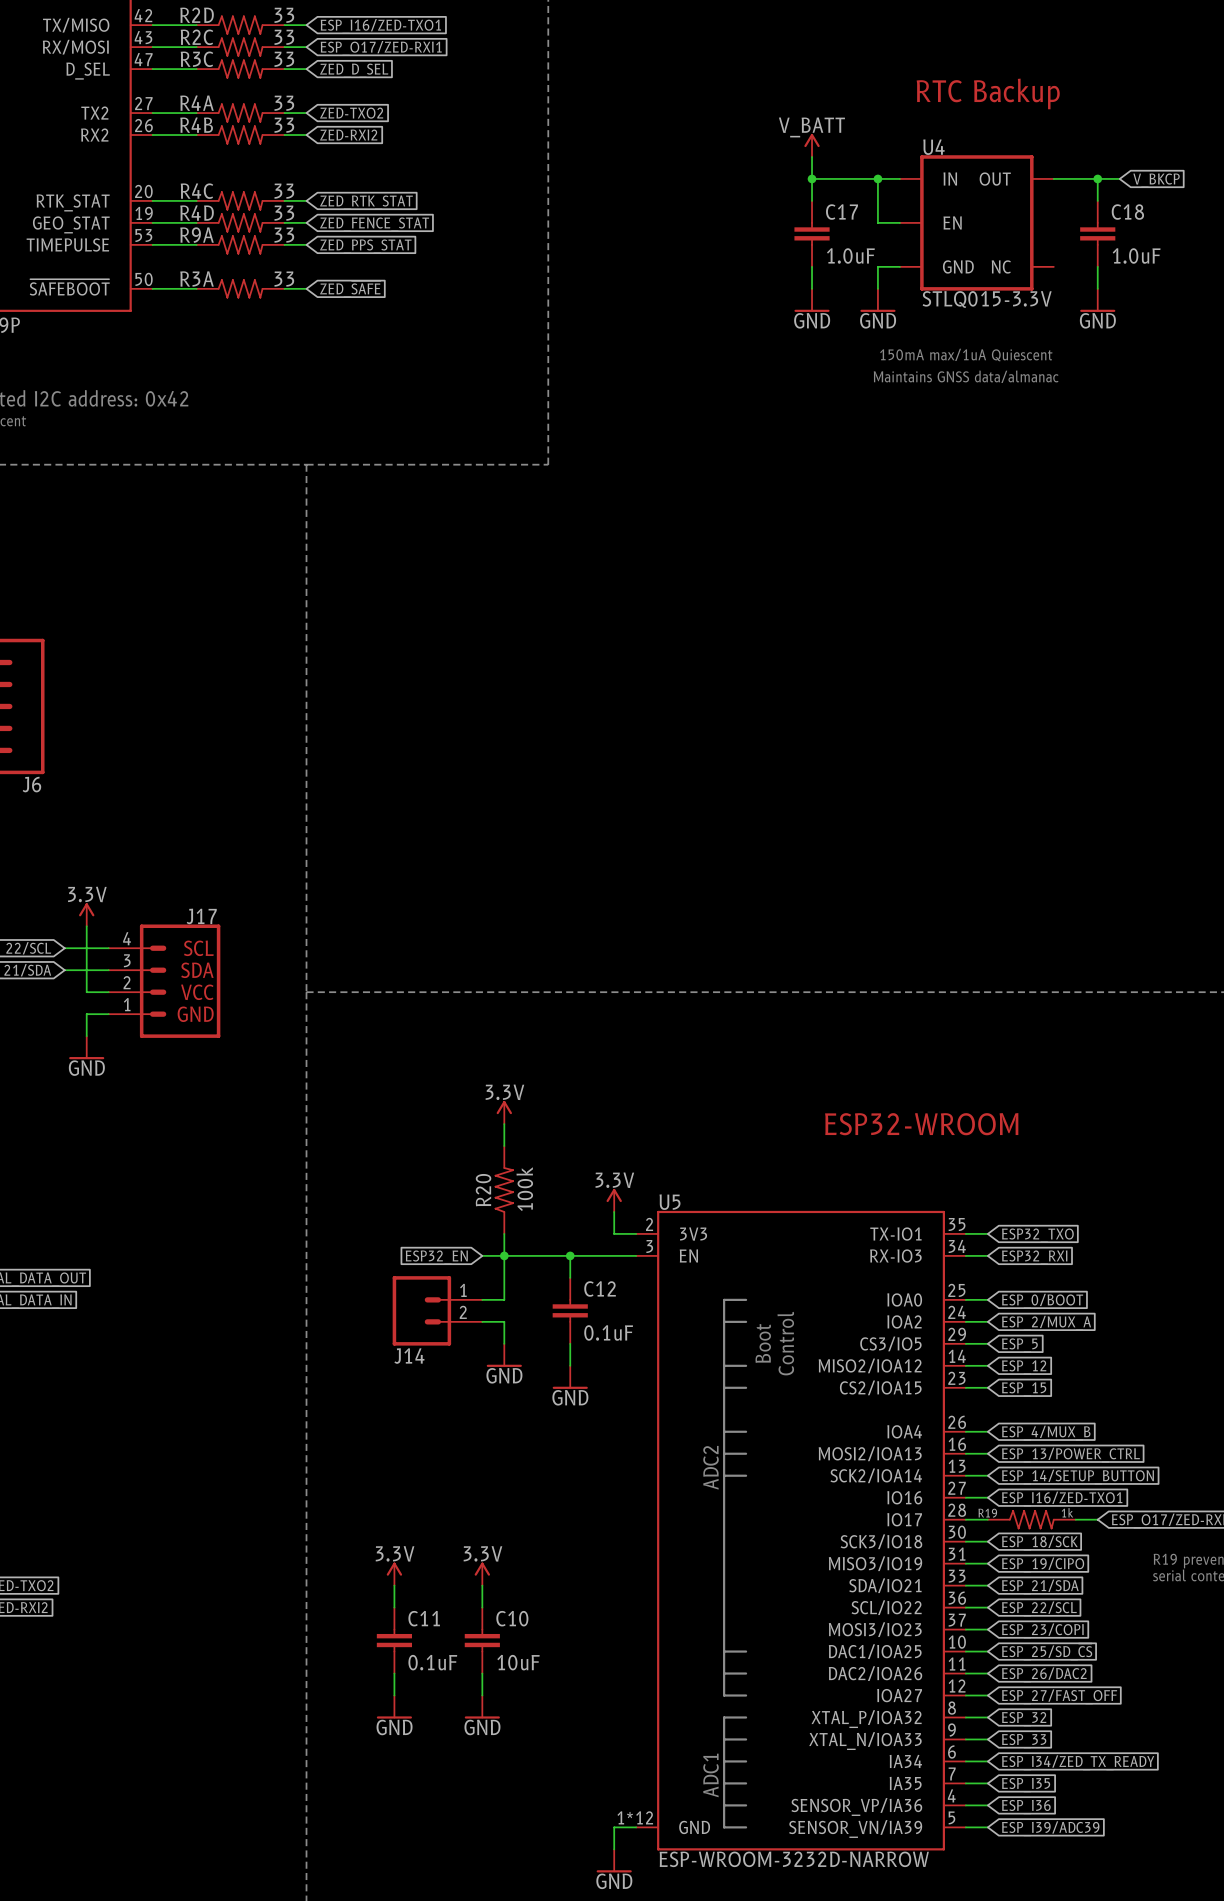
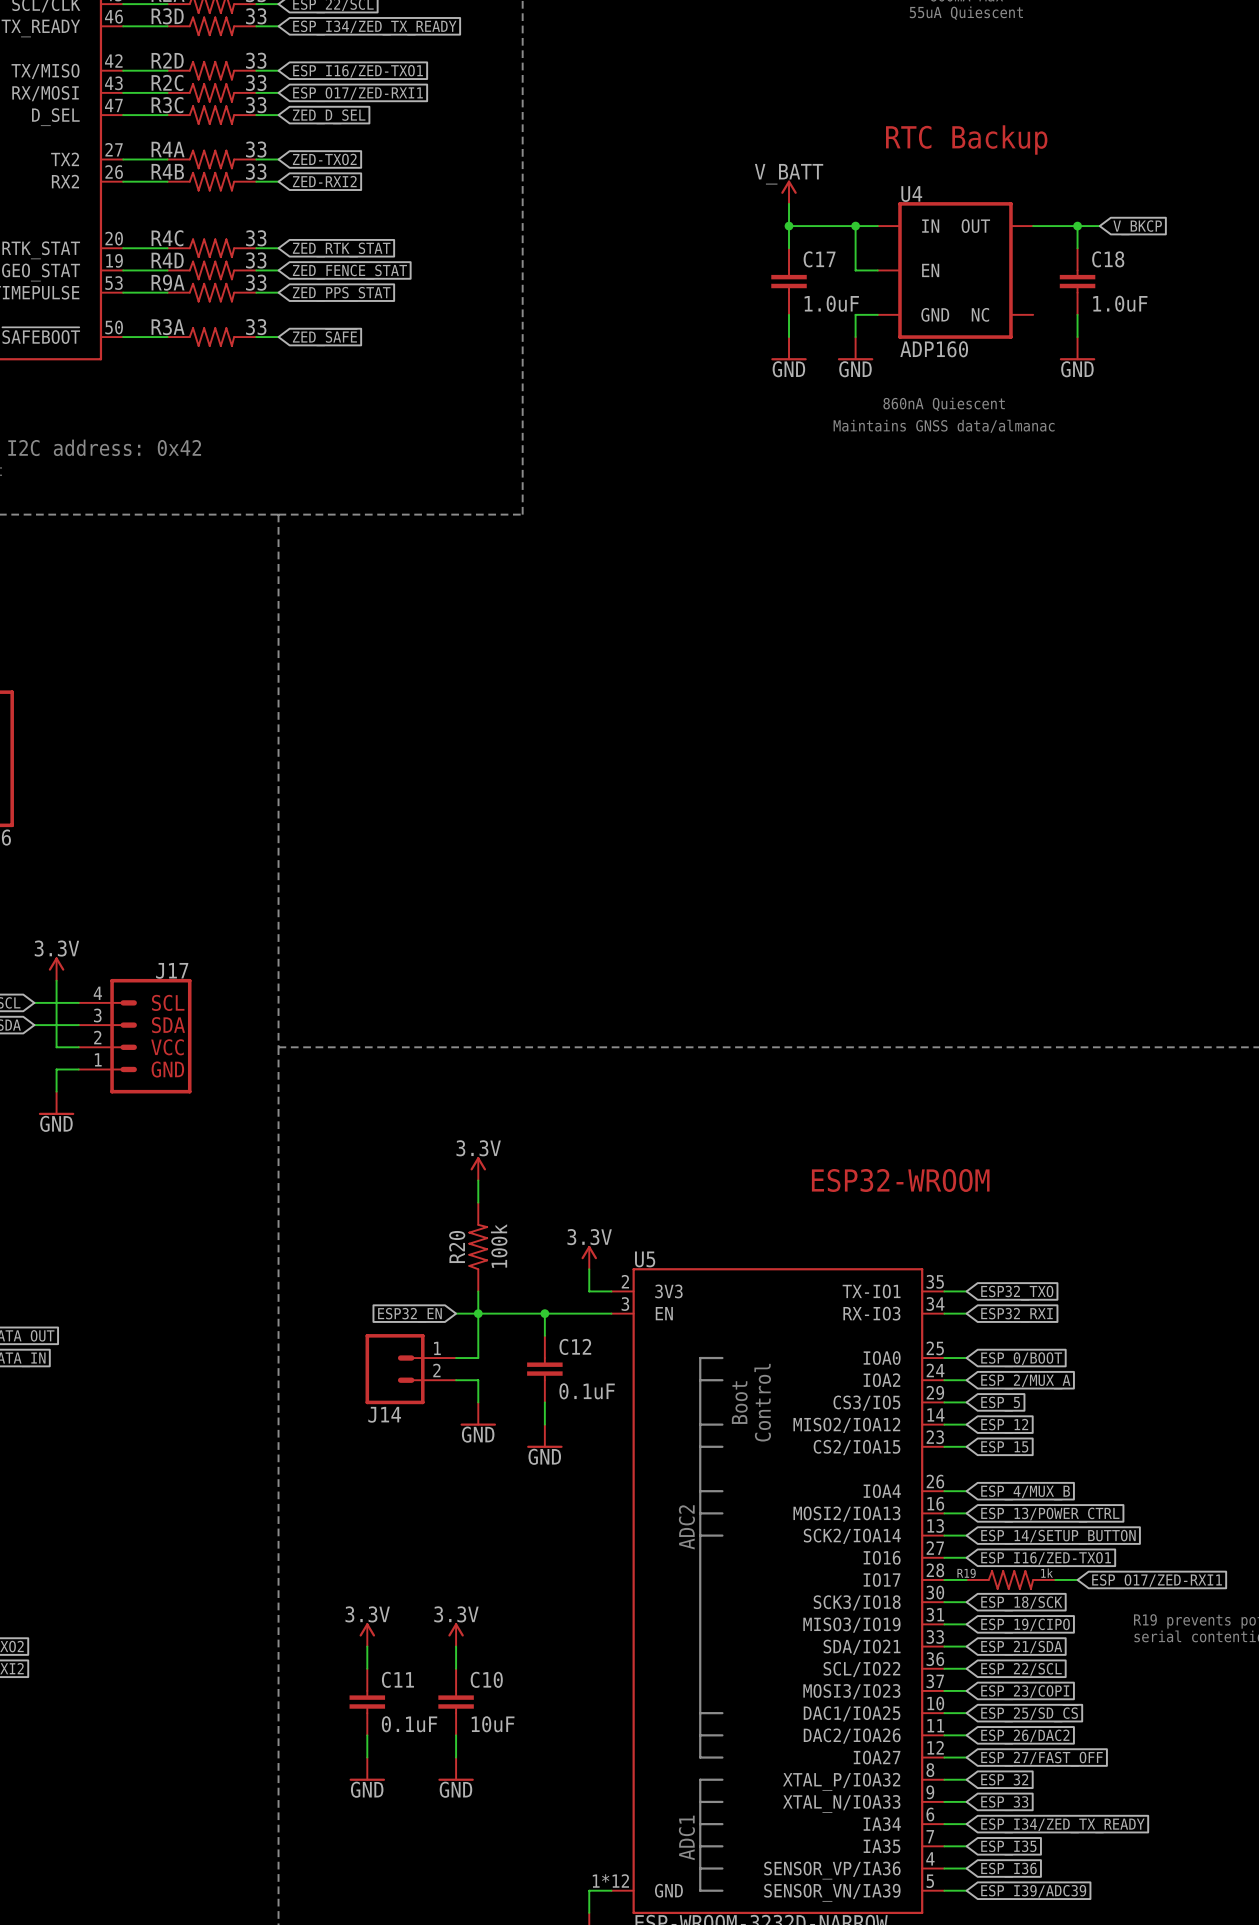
U4 value: STLQ015-3.3V (987, 299) -> ADP160 (934, 349)
text: 150mA max/1uA Quiescent (966, 355) -> 860nA Quiescent (944, 404)

